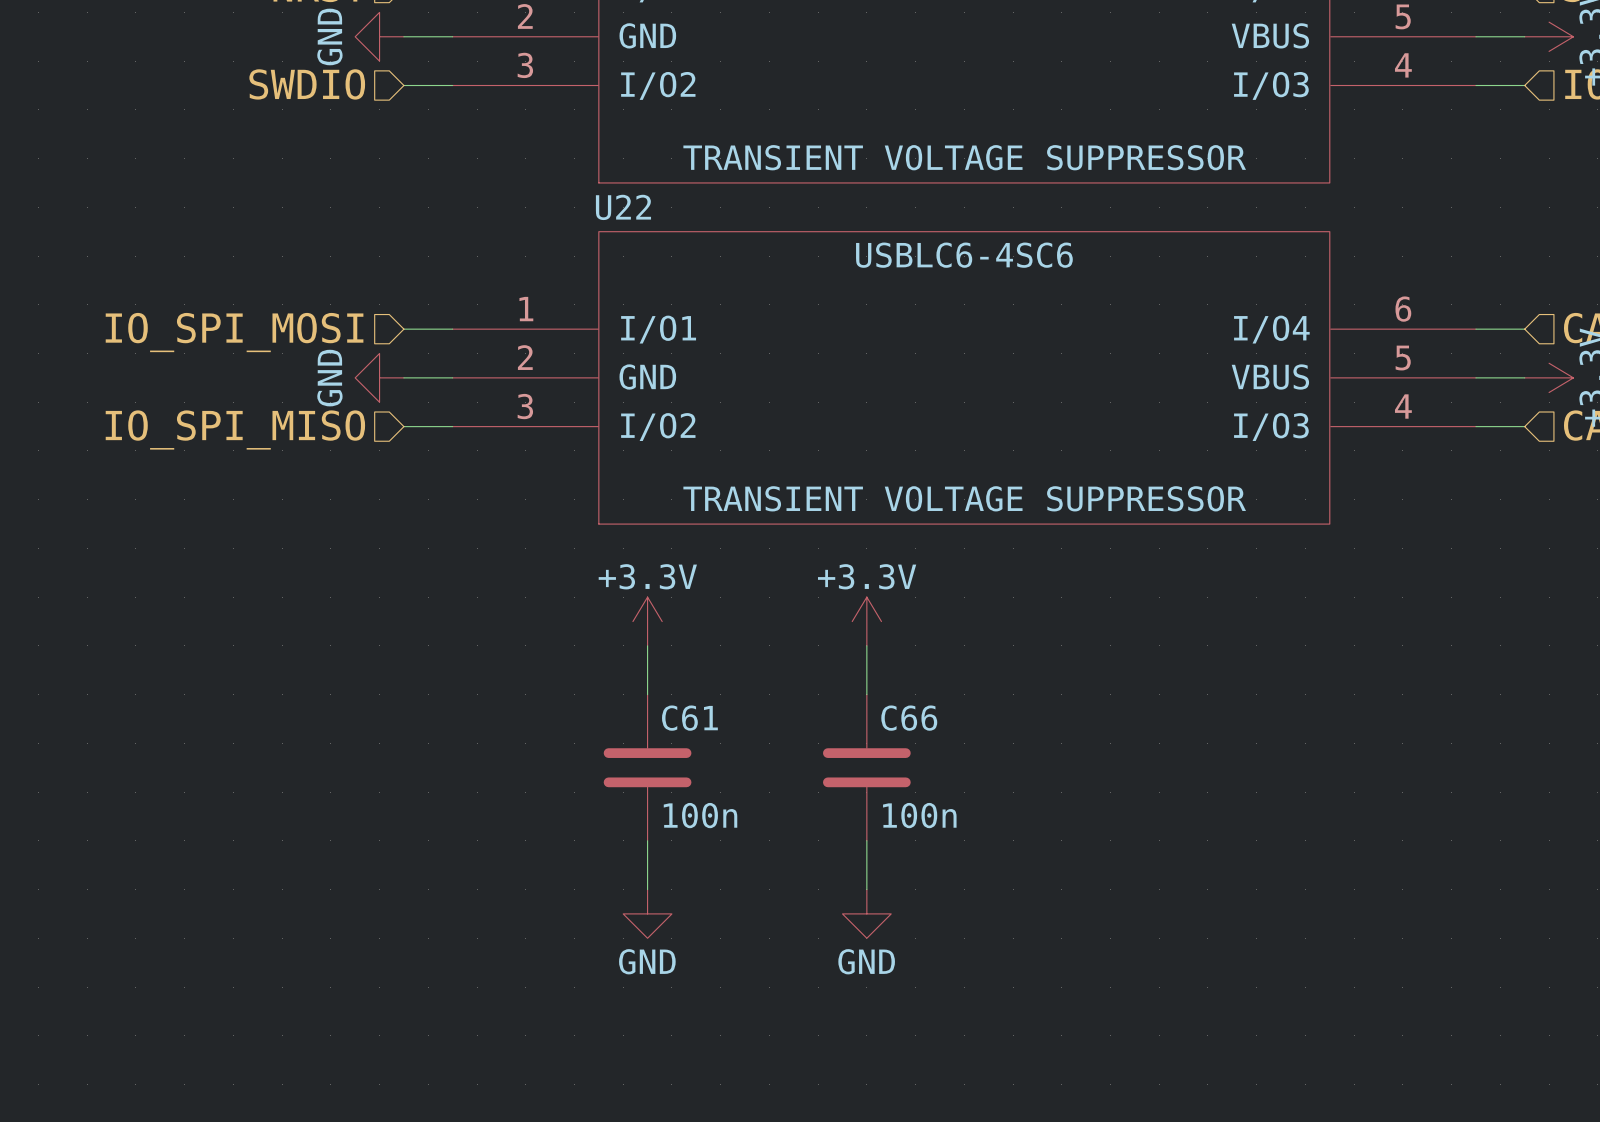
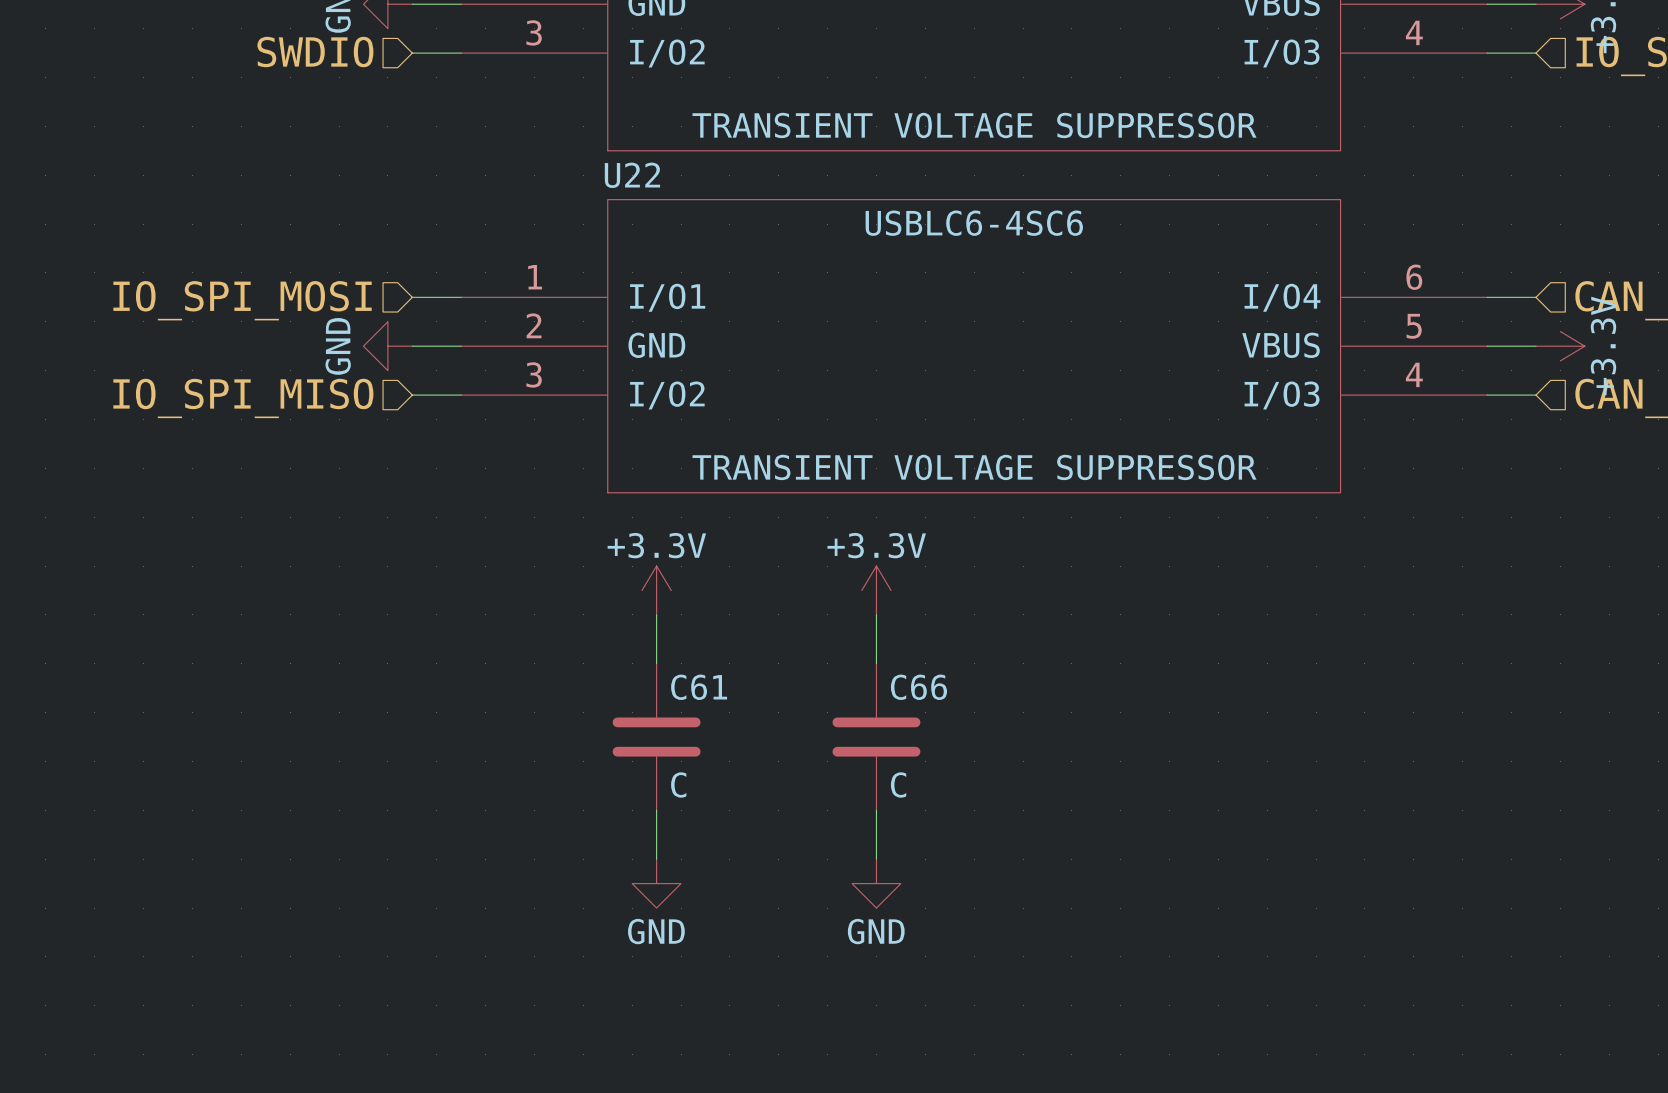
C61 value: 100n (700, 815) -> C (678, 785)
C66 value: 100n (919, 815) -> C (898, 785)

